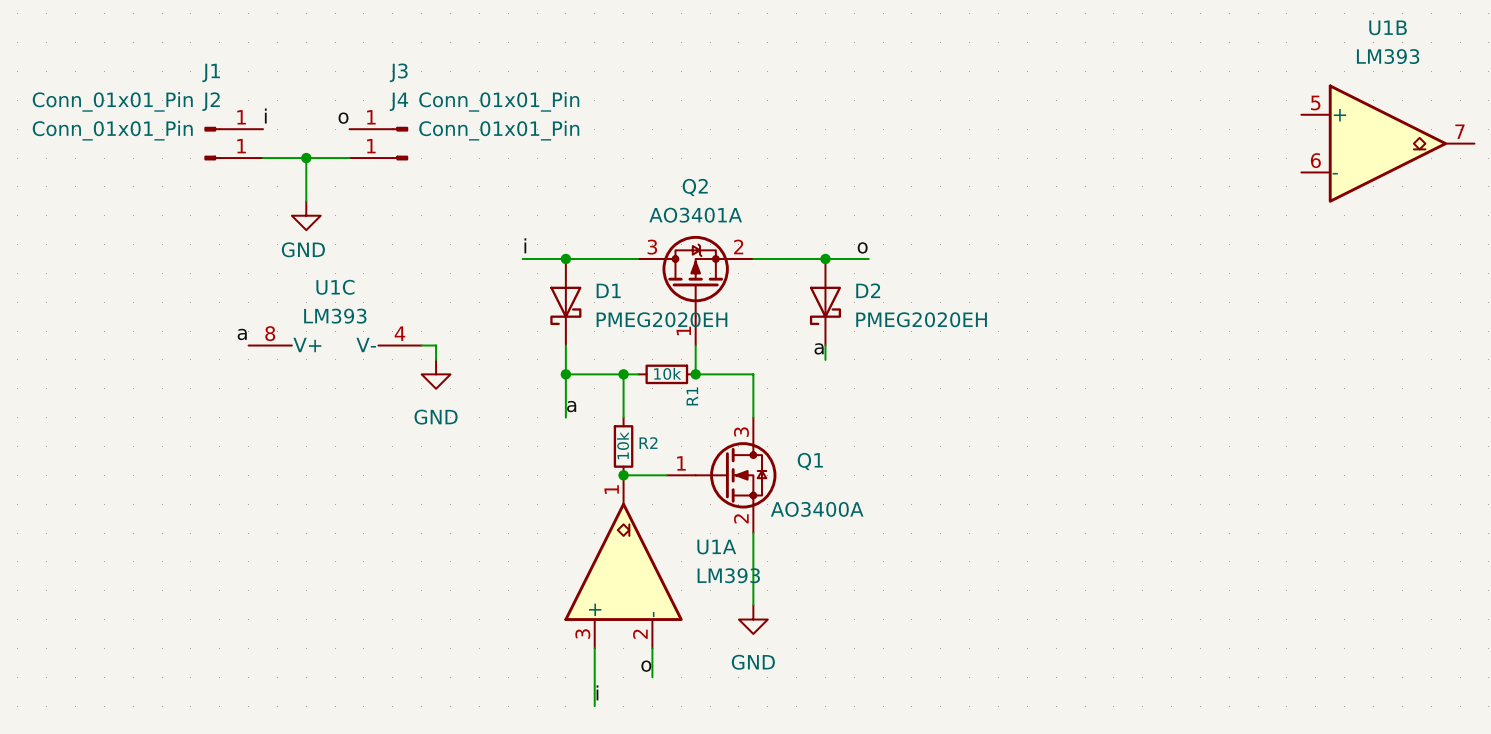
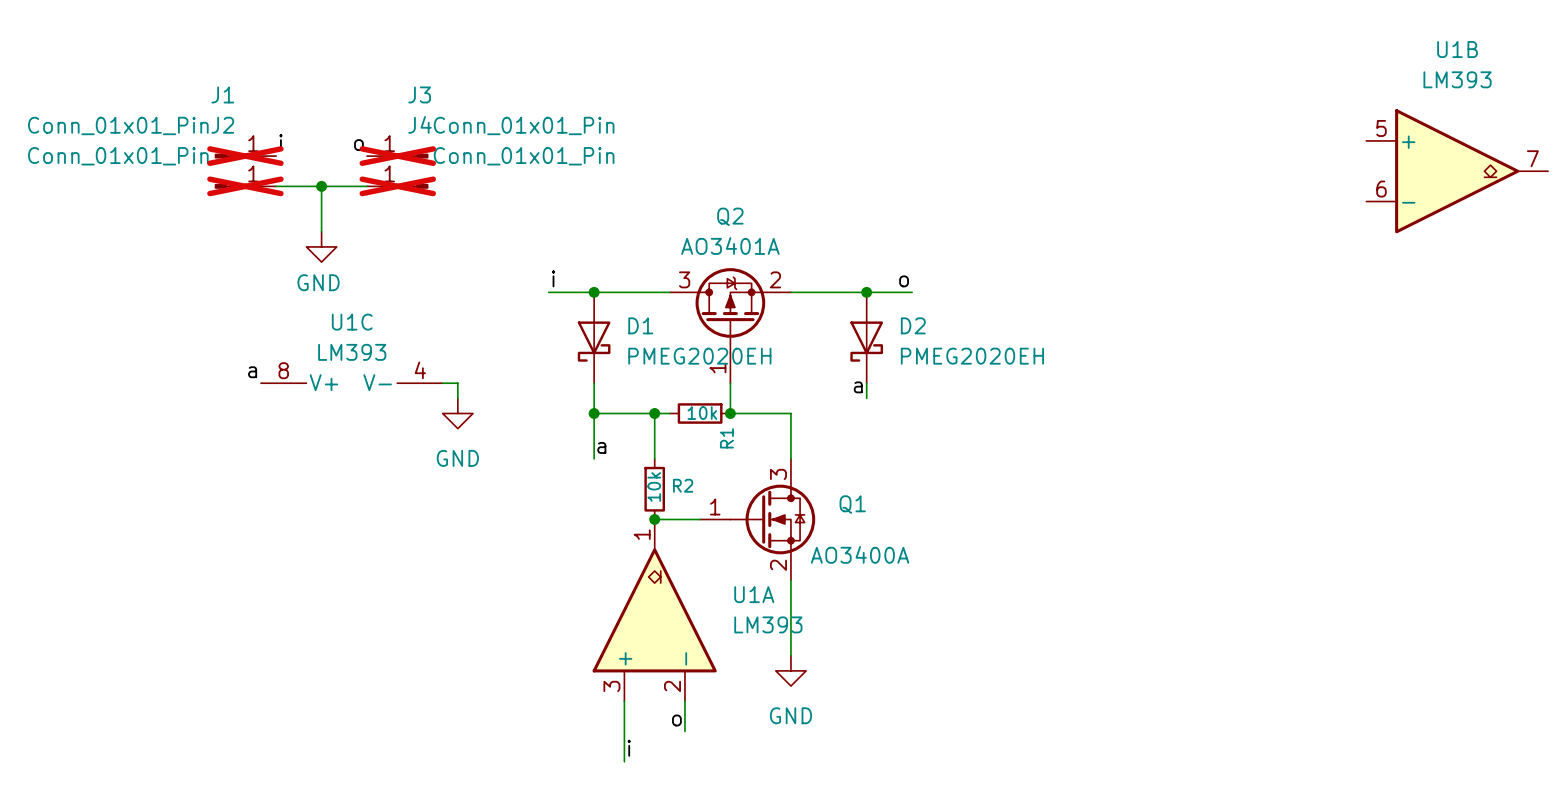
J1 do-not-place cross: none -> (245, 156)
J3 do-not-place cross: none -> (397, 156)
J2 do-not-place cross: none -> (245, 186)
J4 do-not-place cross: none -> (397, 186)

